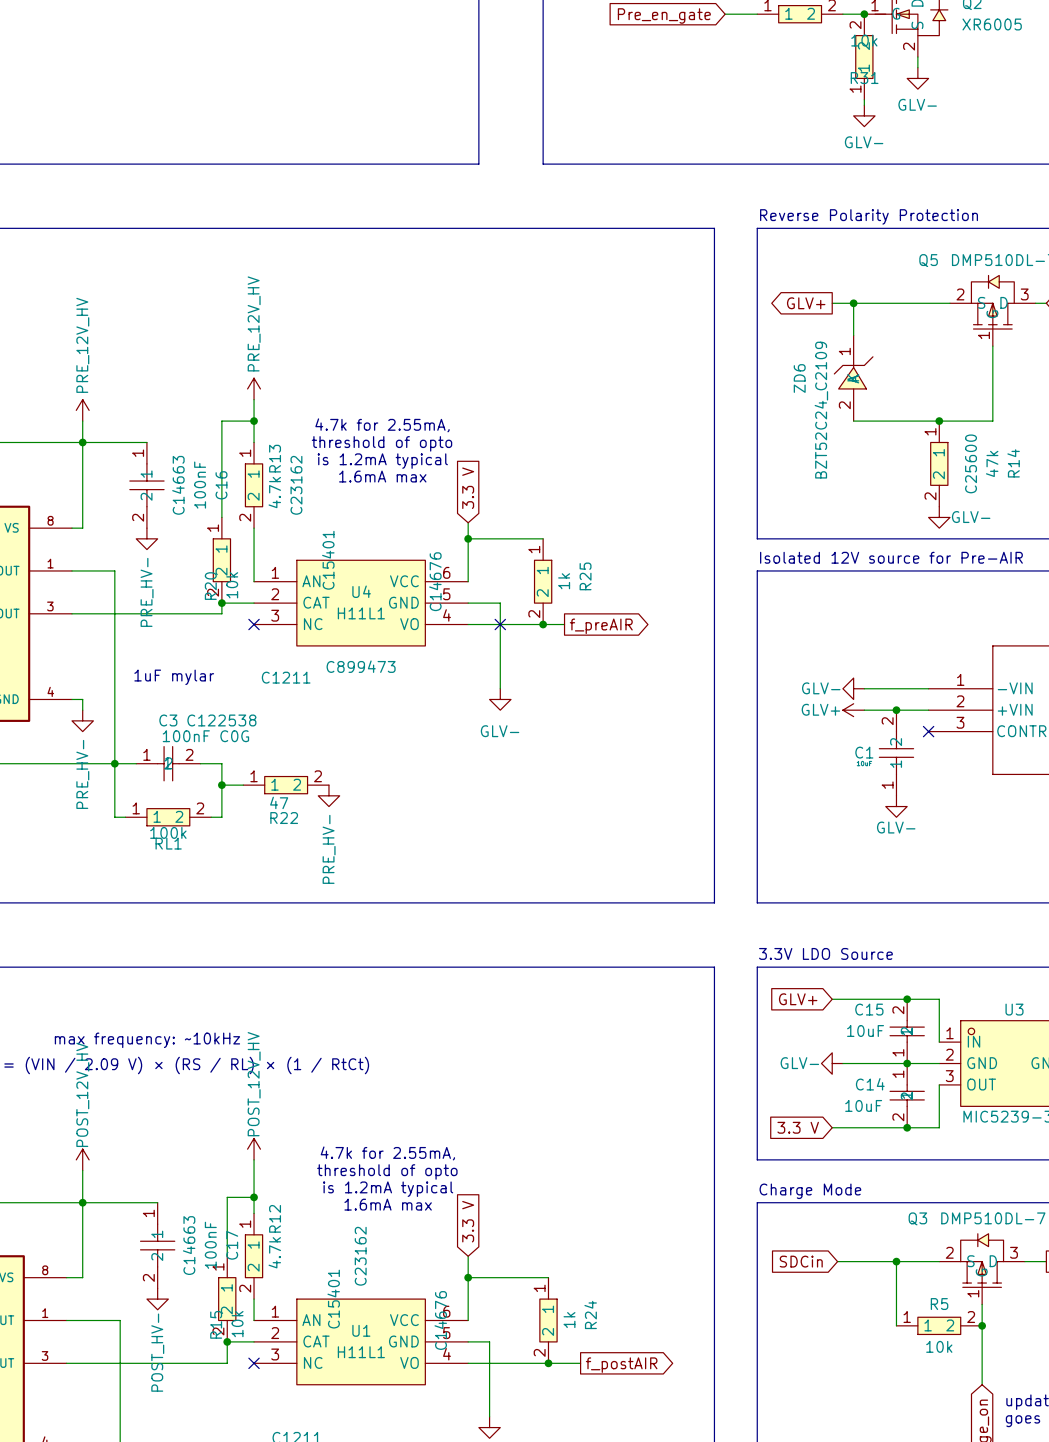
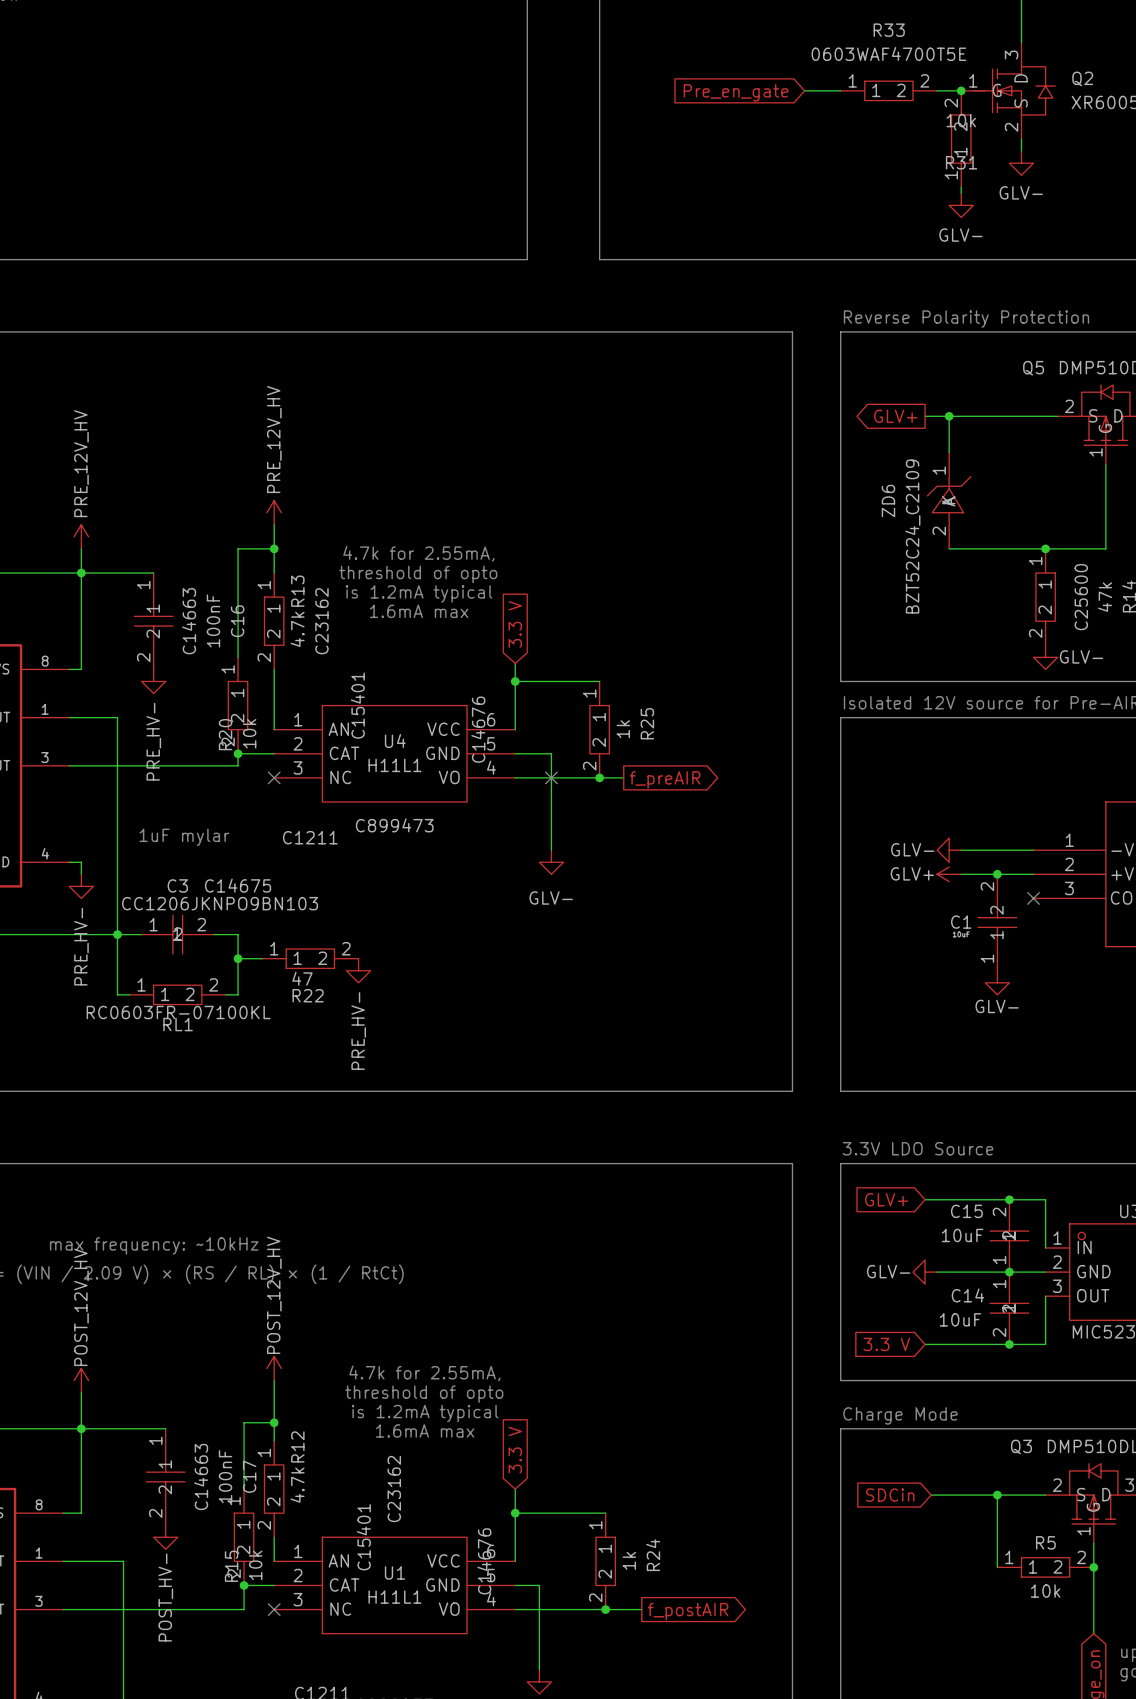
RL1 text: C122538 (221, 720) -> C14675 (238, 885)
C3 value: 100nF C0G (205, 736) -> CC1206JKNPO9BN103 (220, 903)
RL1 value: 100k (168, 832) -> RC0603FR-07100KL (178, 1012)

